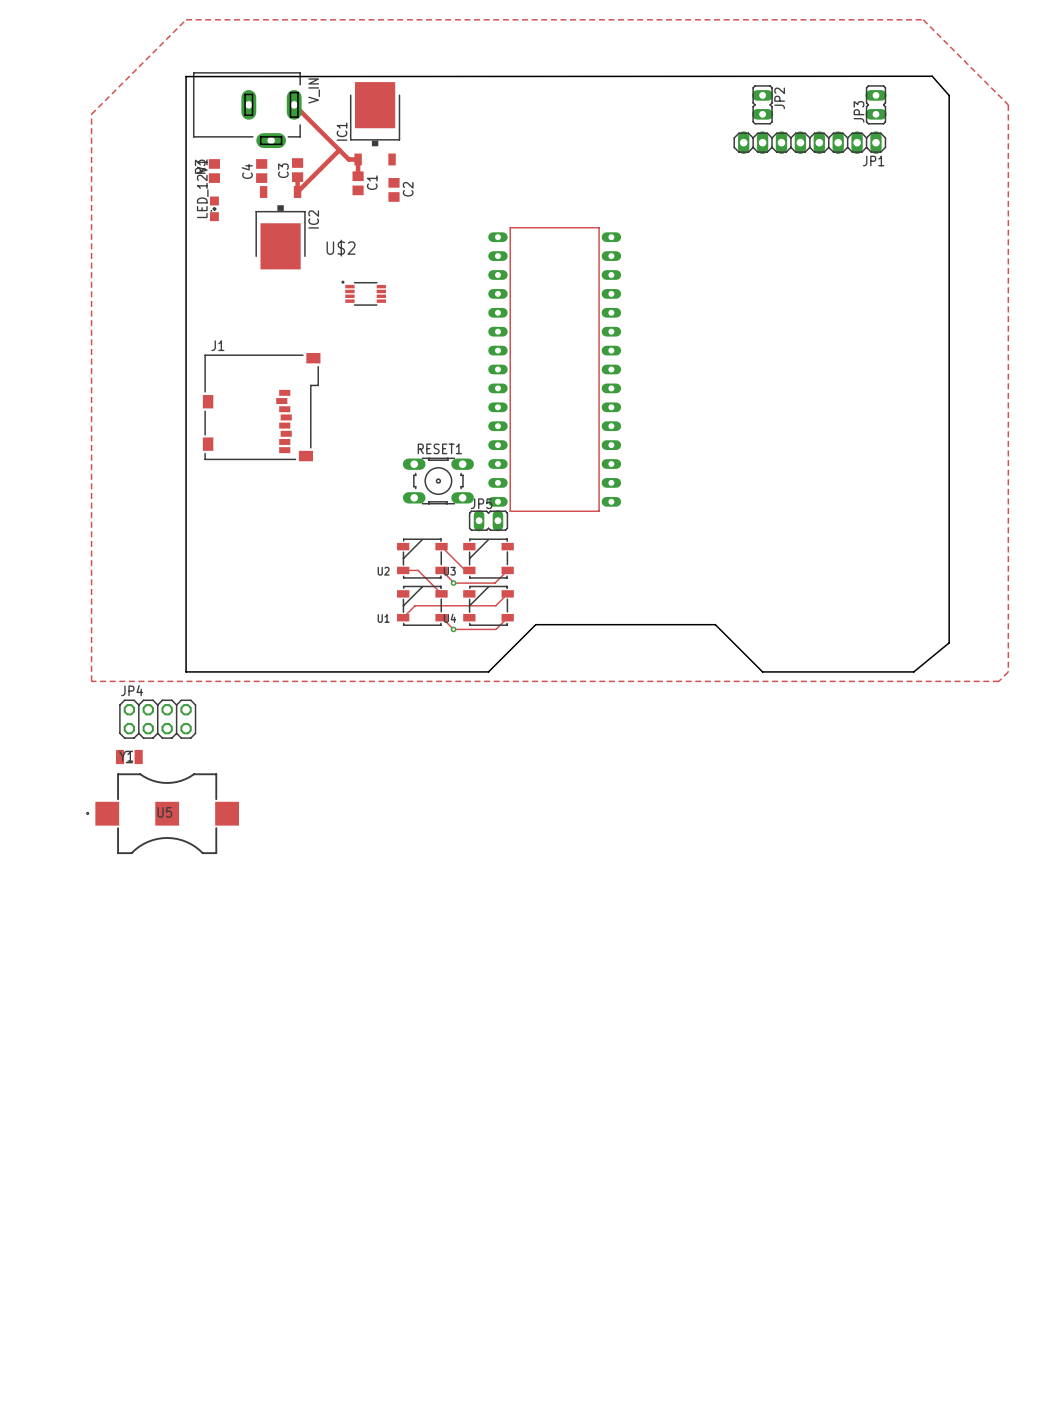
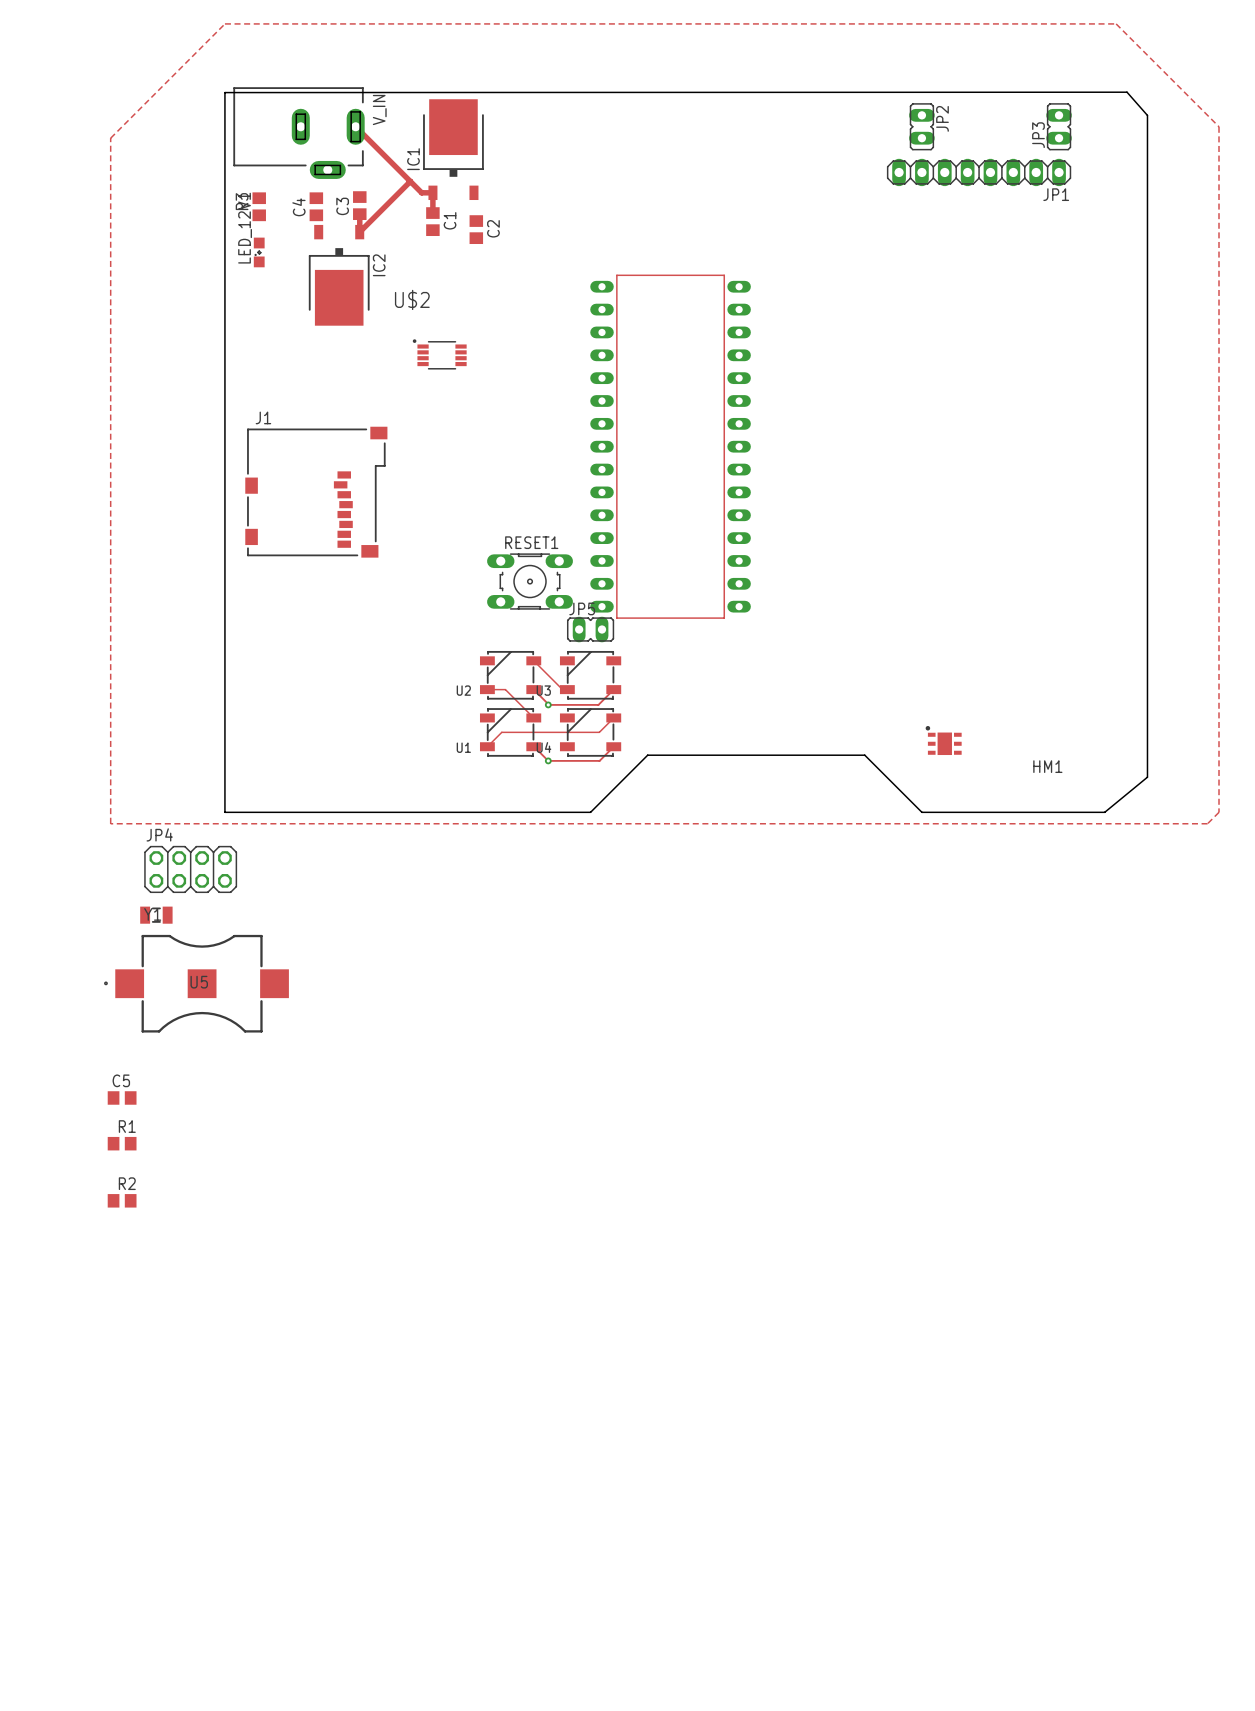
HM1: none -> (943, 740)
C5: none -> (122, 1097)
R1: none -> (122, 1143)
R2: none -> (122, 1200)

